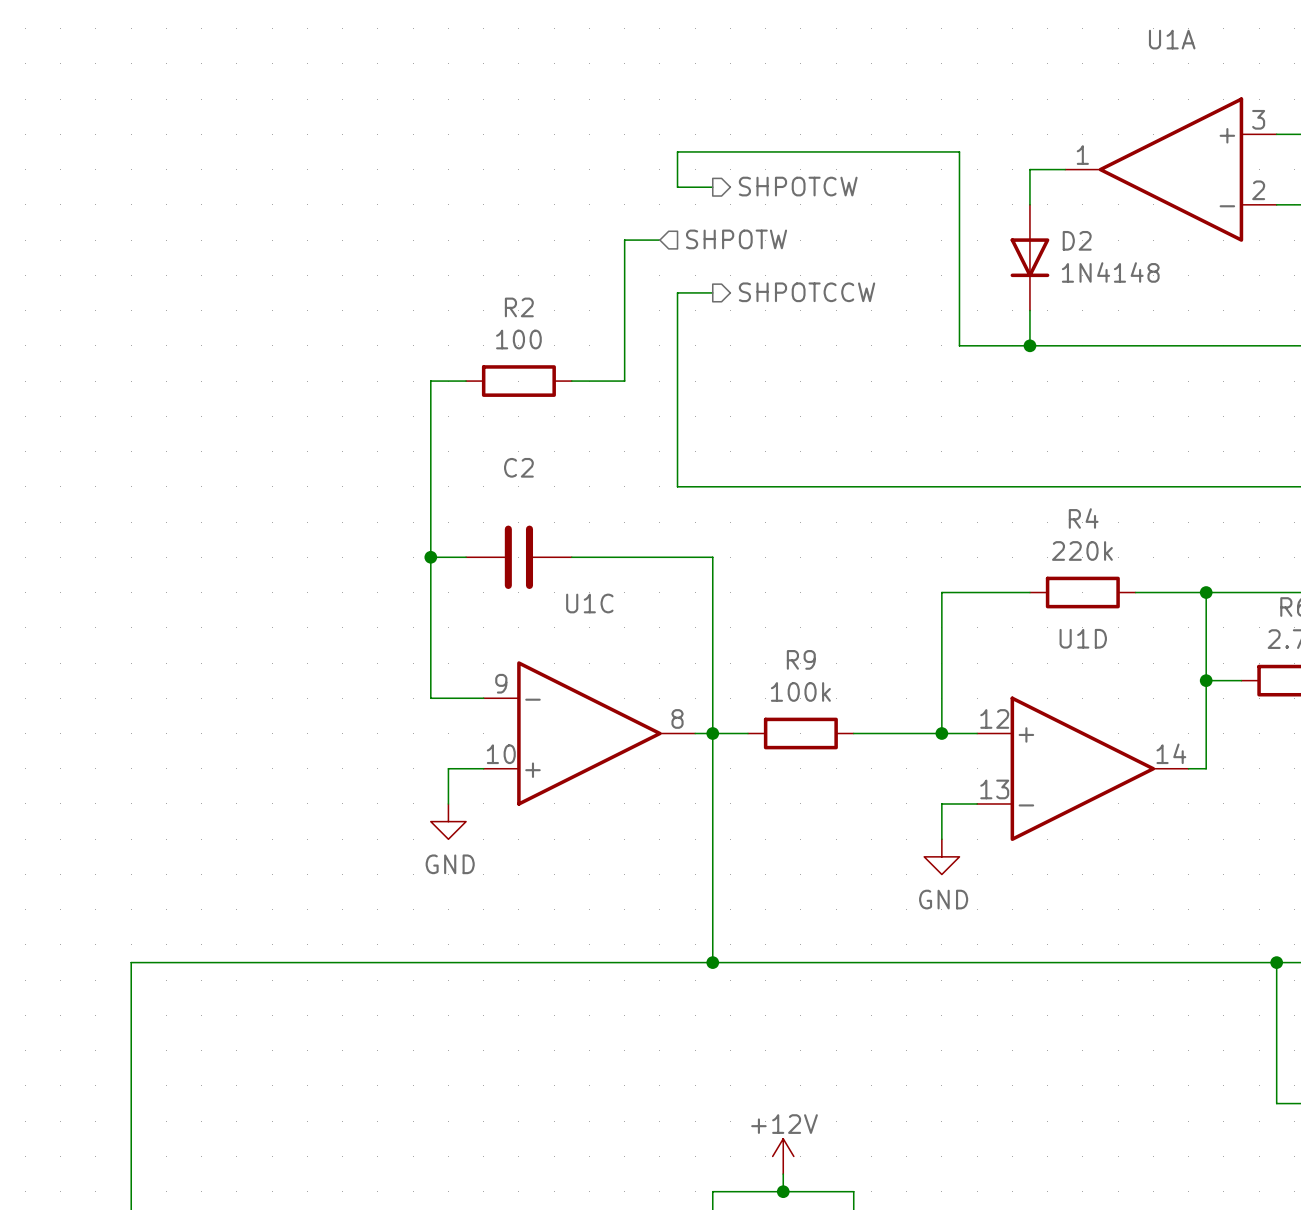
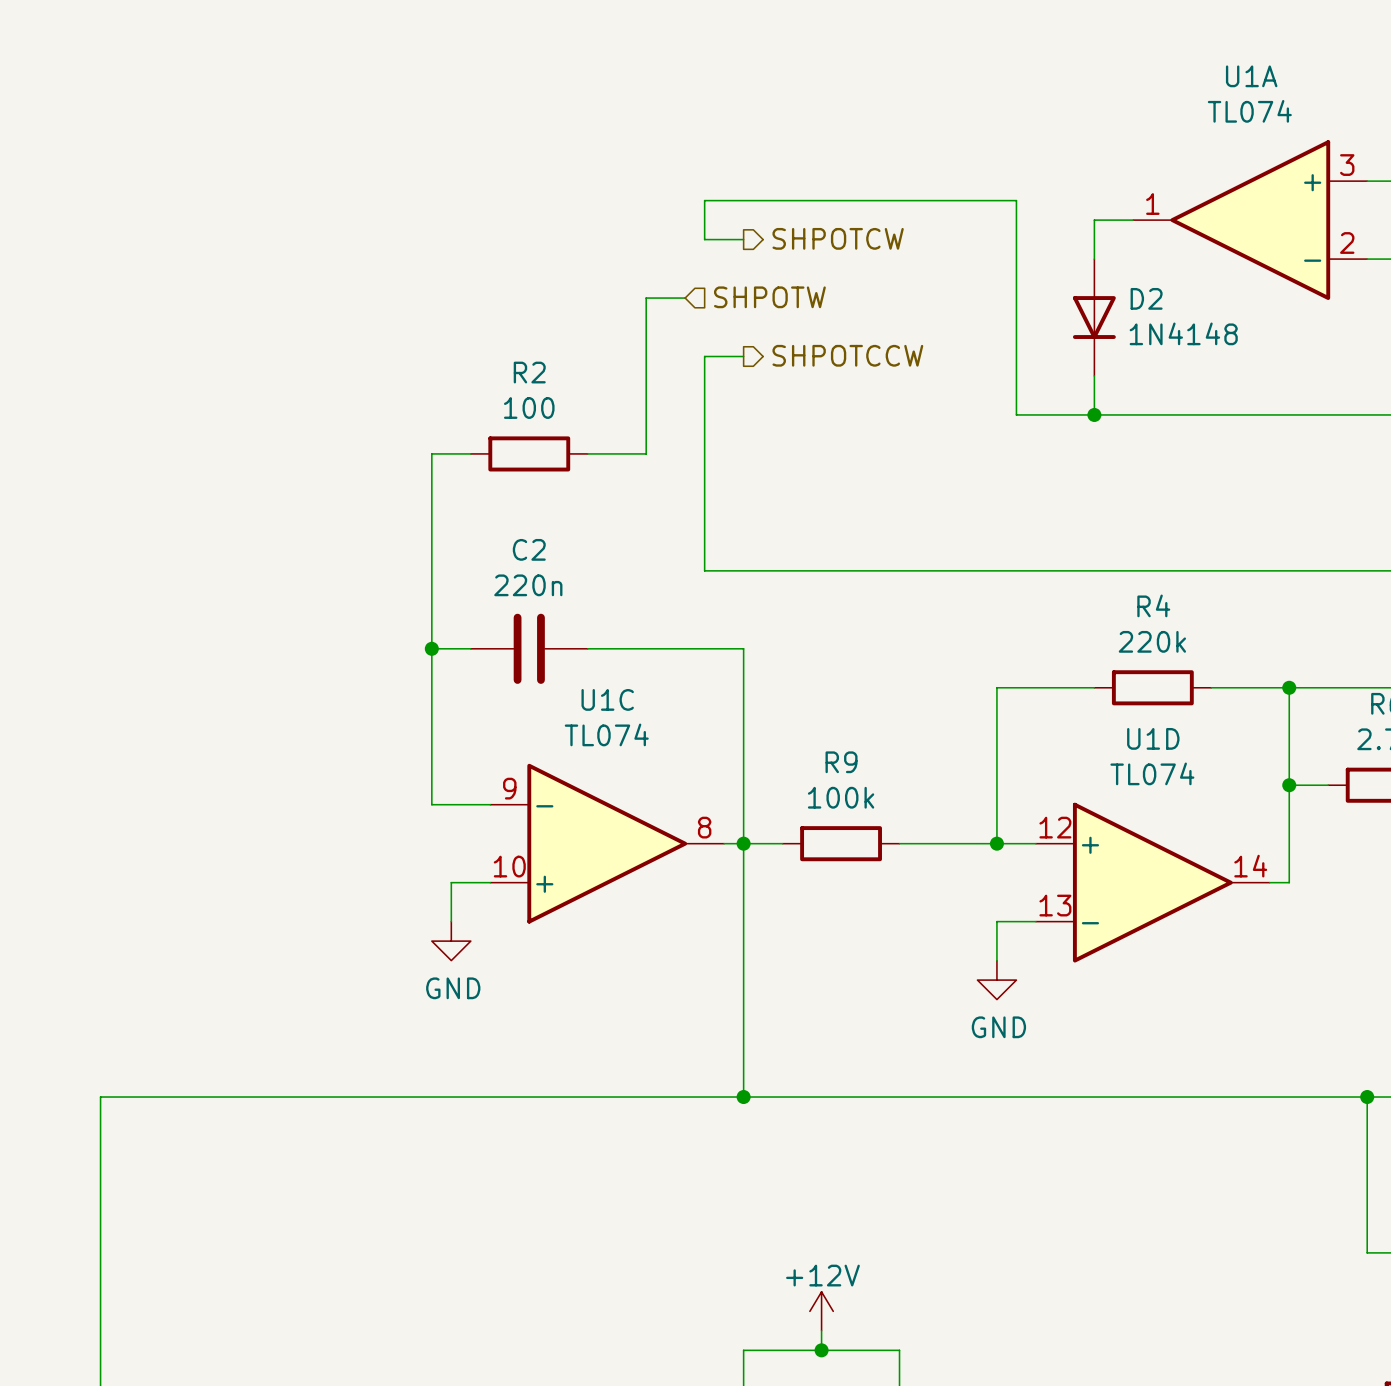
U1A value: none -> TL074 (1249, 111)
C2 value: none -> 220n (528, 585)
U1C value: none -> TL074 (606, 734)
U1D value: none -> TL074 (1152, 773)

